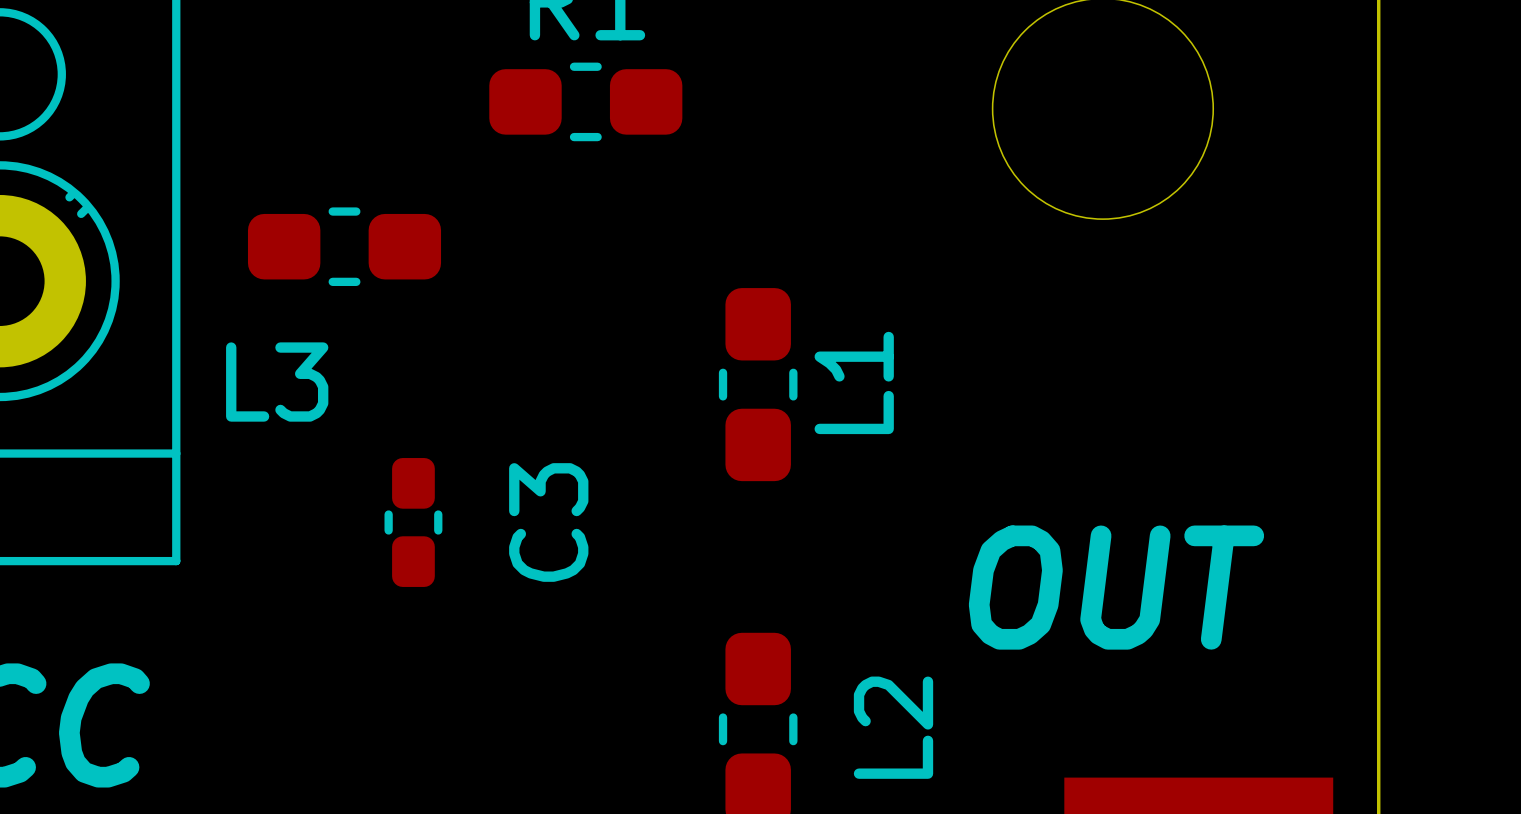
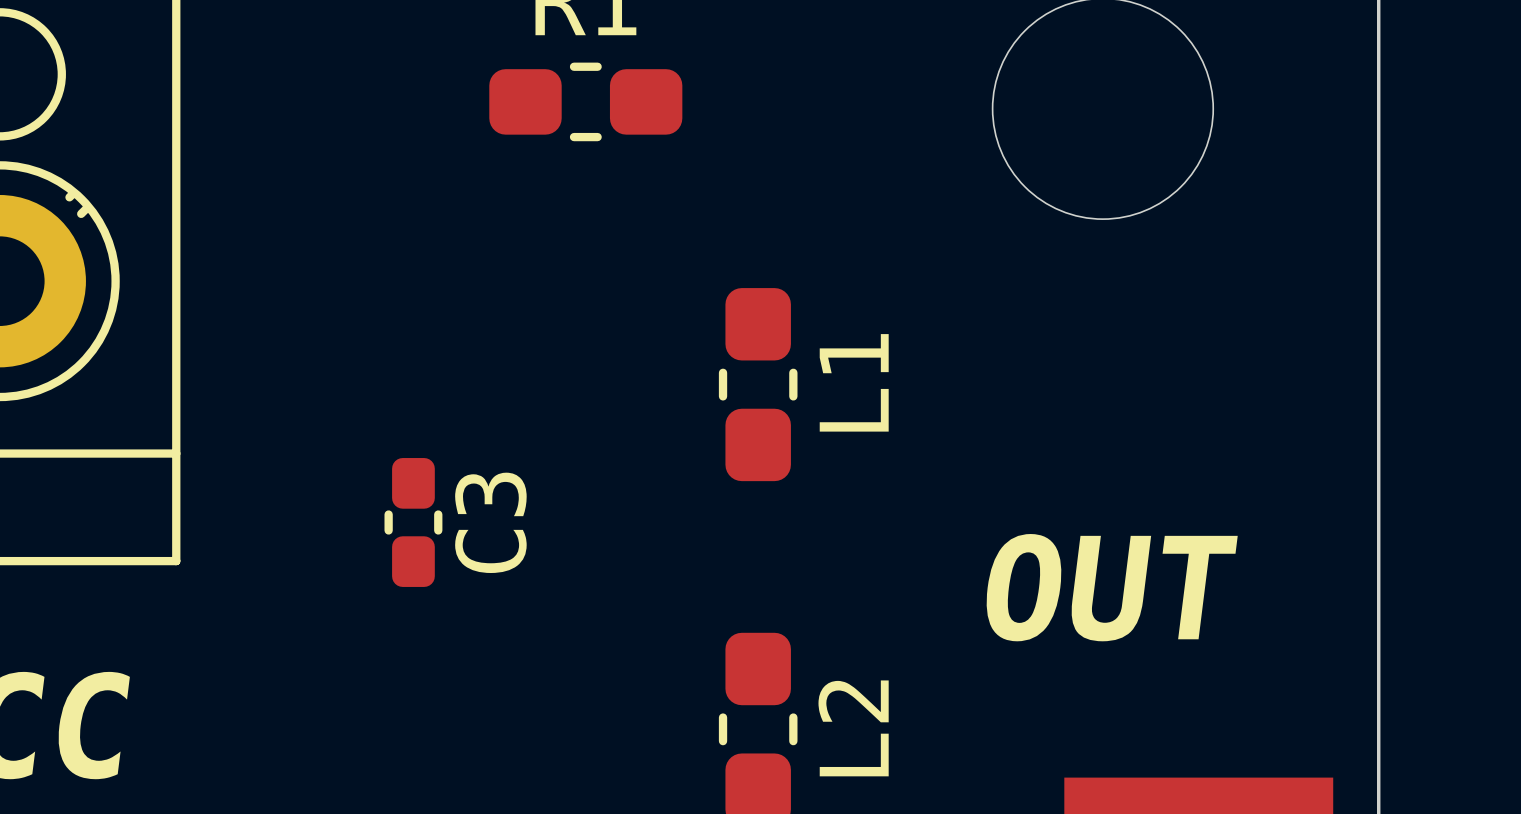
L3: (344, 246) -> none
C3 name position: C3 (548, 522) -> C3 (490, 522)
L2 name position: L2 (893, 727) -> L2 (853, 728)

